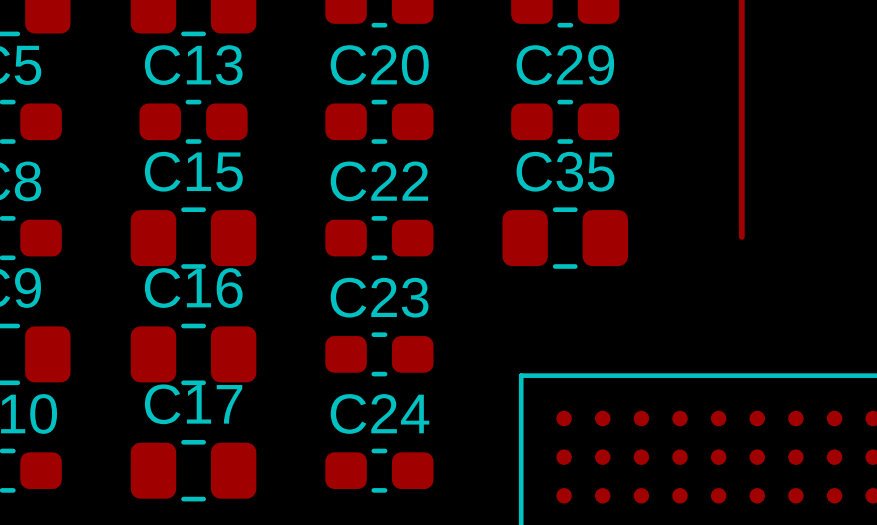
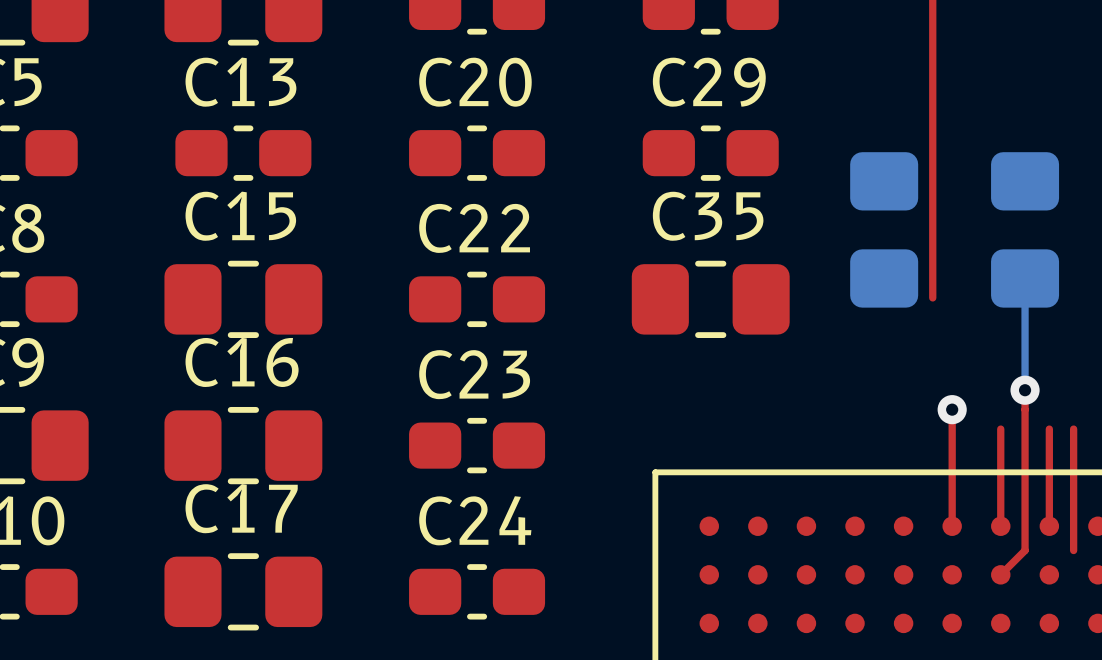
part: none -> (884, 229)
part: none -> (1025, 229)
bottom track: none -> (1025, 278) (1025, 390)
top track: none -> (1025, 390) (1025, 550) (1000, 574)
via: none -> (1025, 390)
top track: none -> (952, 409) (952, 526)
via: none -> (952, 409)
top track: none -> (1000, 429) (1000, 526)
top track: none -> (1049, 429) (1049, 526)
top track: none -> (1073, 429) (1073, 550)

